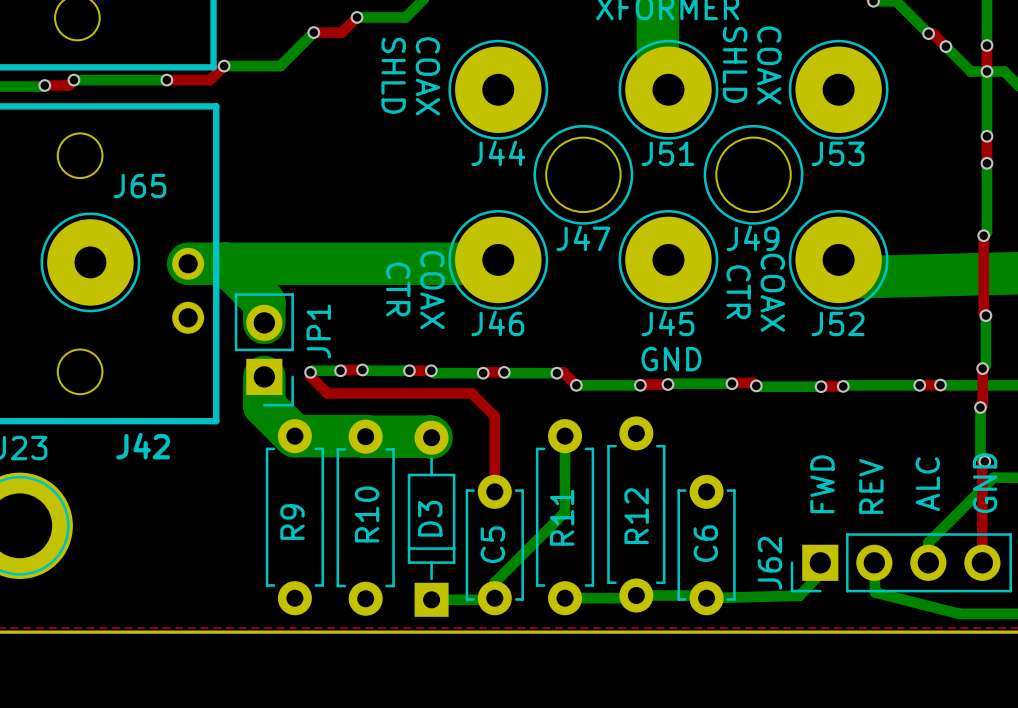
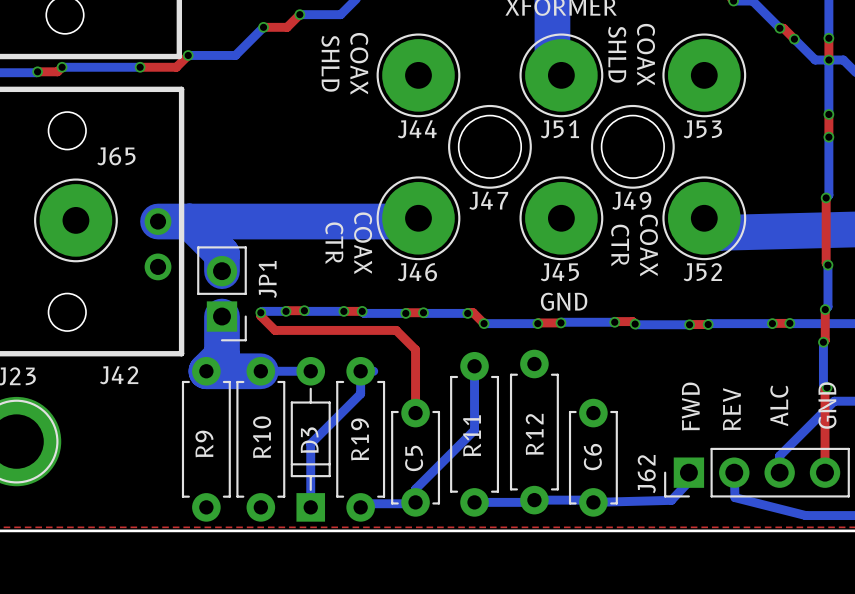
bottom track: (264, 405) (294, 436) (431, 437) -> (222, 340) (222, 355) (206, 371) (310, 371)
bottom track: none -> (373, 371) (360, 371) (360, 393) (310, 443) (310, 507)
R9 position: (294, 517) -> (206, 439)
R10 position: (365, 517) -> (260, 439)
D3 position: (431, 518) -> (310, 439)
R19: none -> (360, 439)

